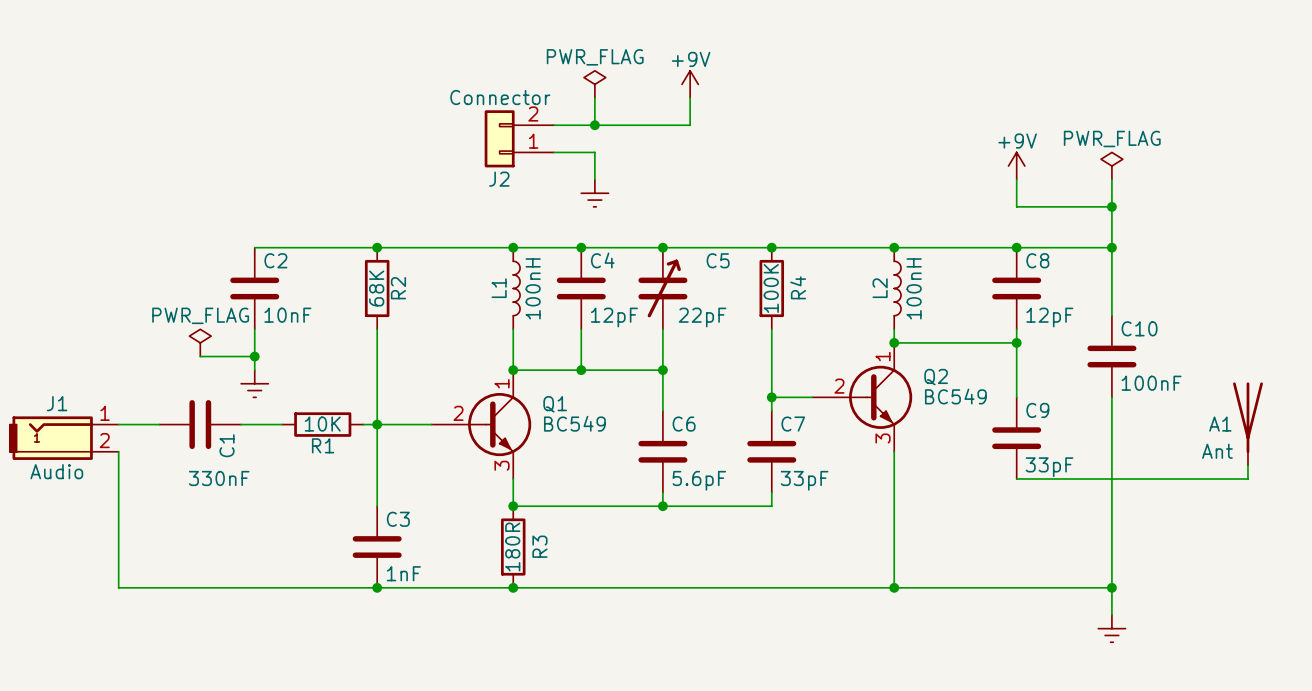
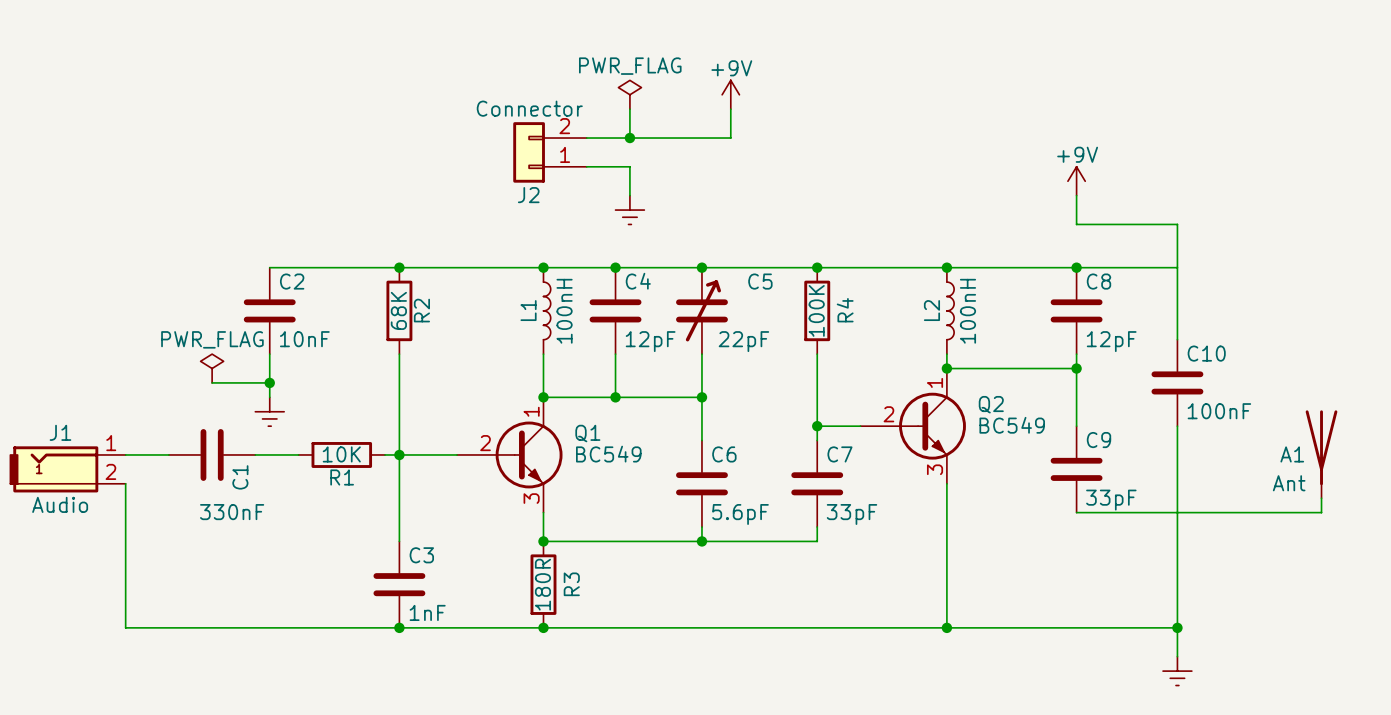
power symbol: PWR_FLAG (1111, 166) -> none
wire: (1111, 179) (1111, 206) -> none
junction: (1111, 206) -> none
junction: (1111, 247) -> none

